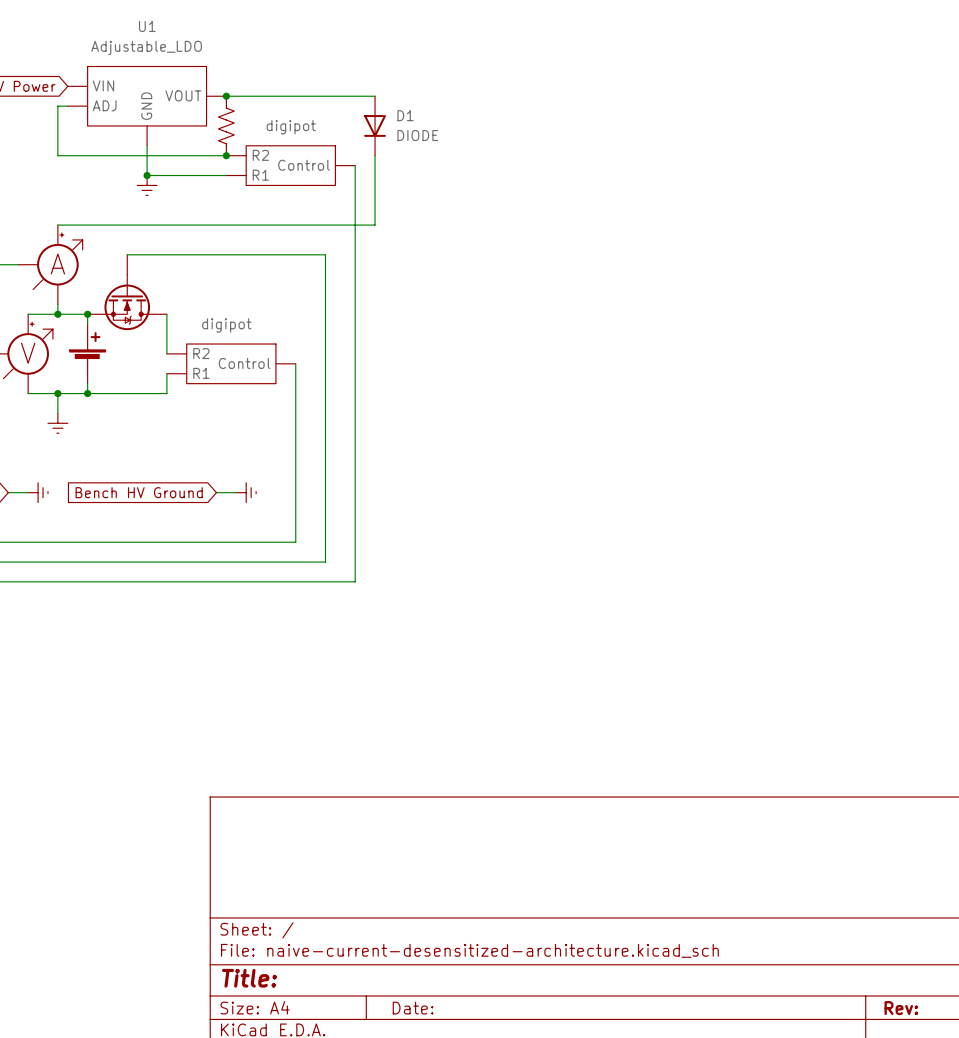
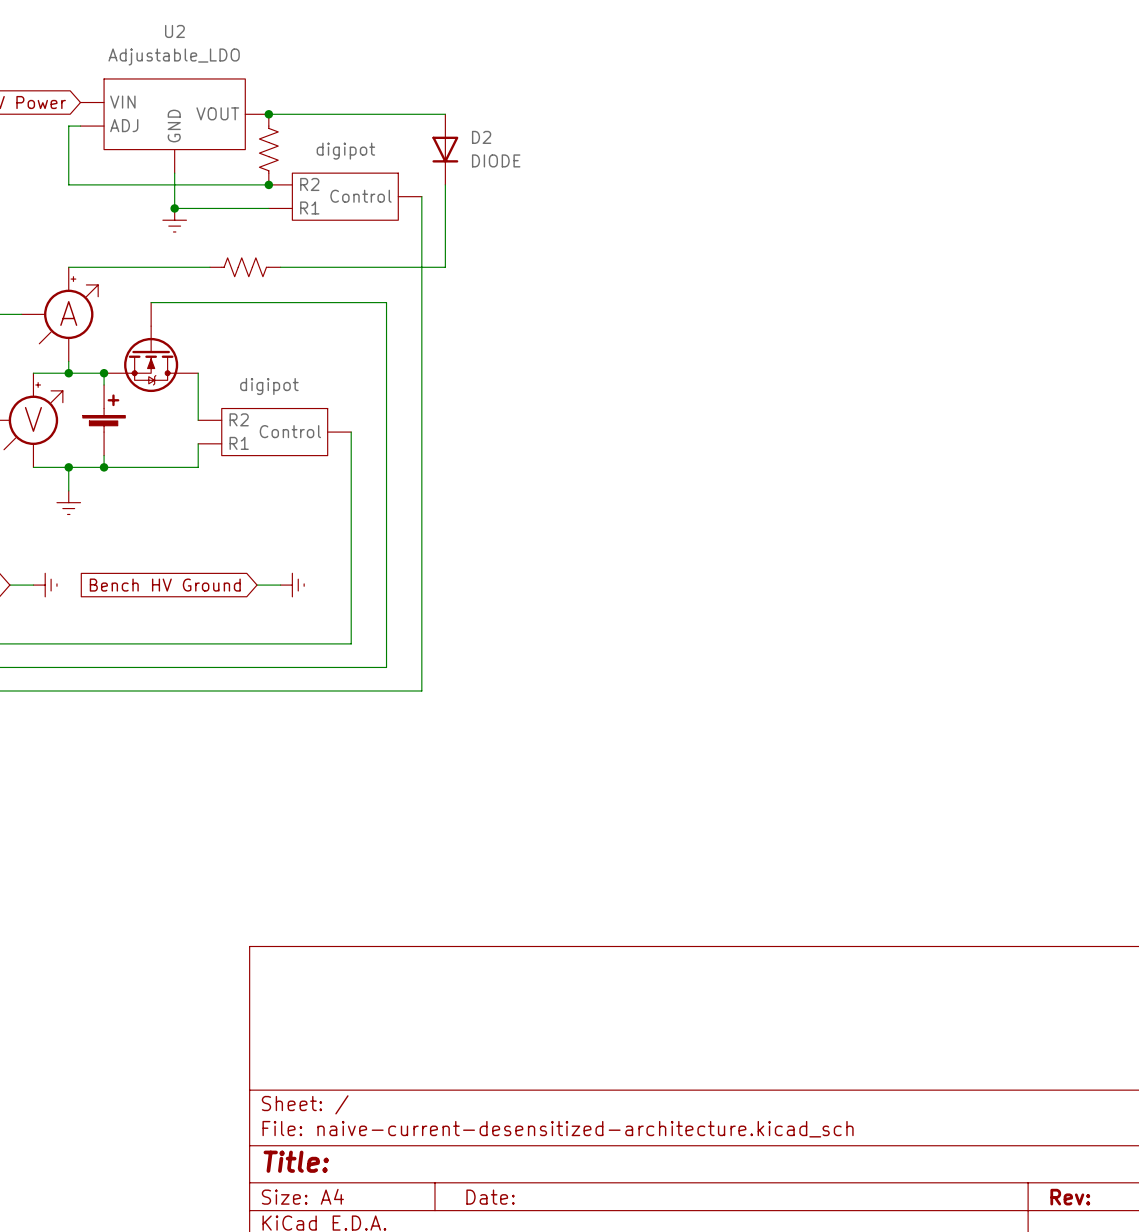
U1 name: U1 (147, 26) -> U2 (174, 31)
D1 name: D1 (405, 115) -> D2 (481, 137)
part: none -> (245, 267)

